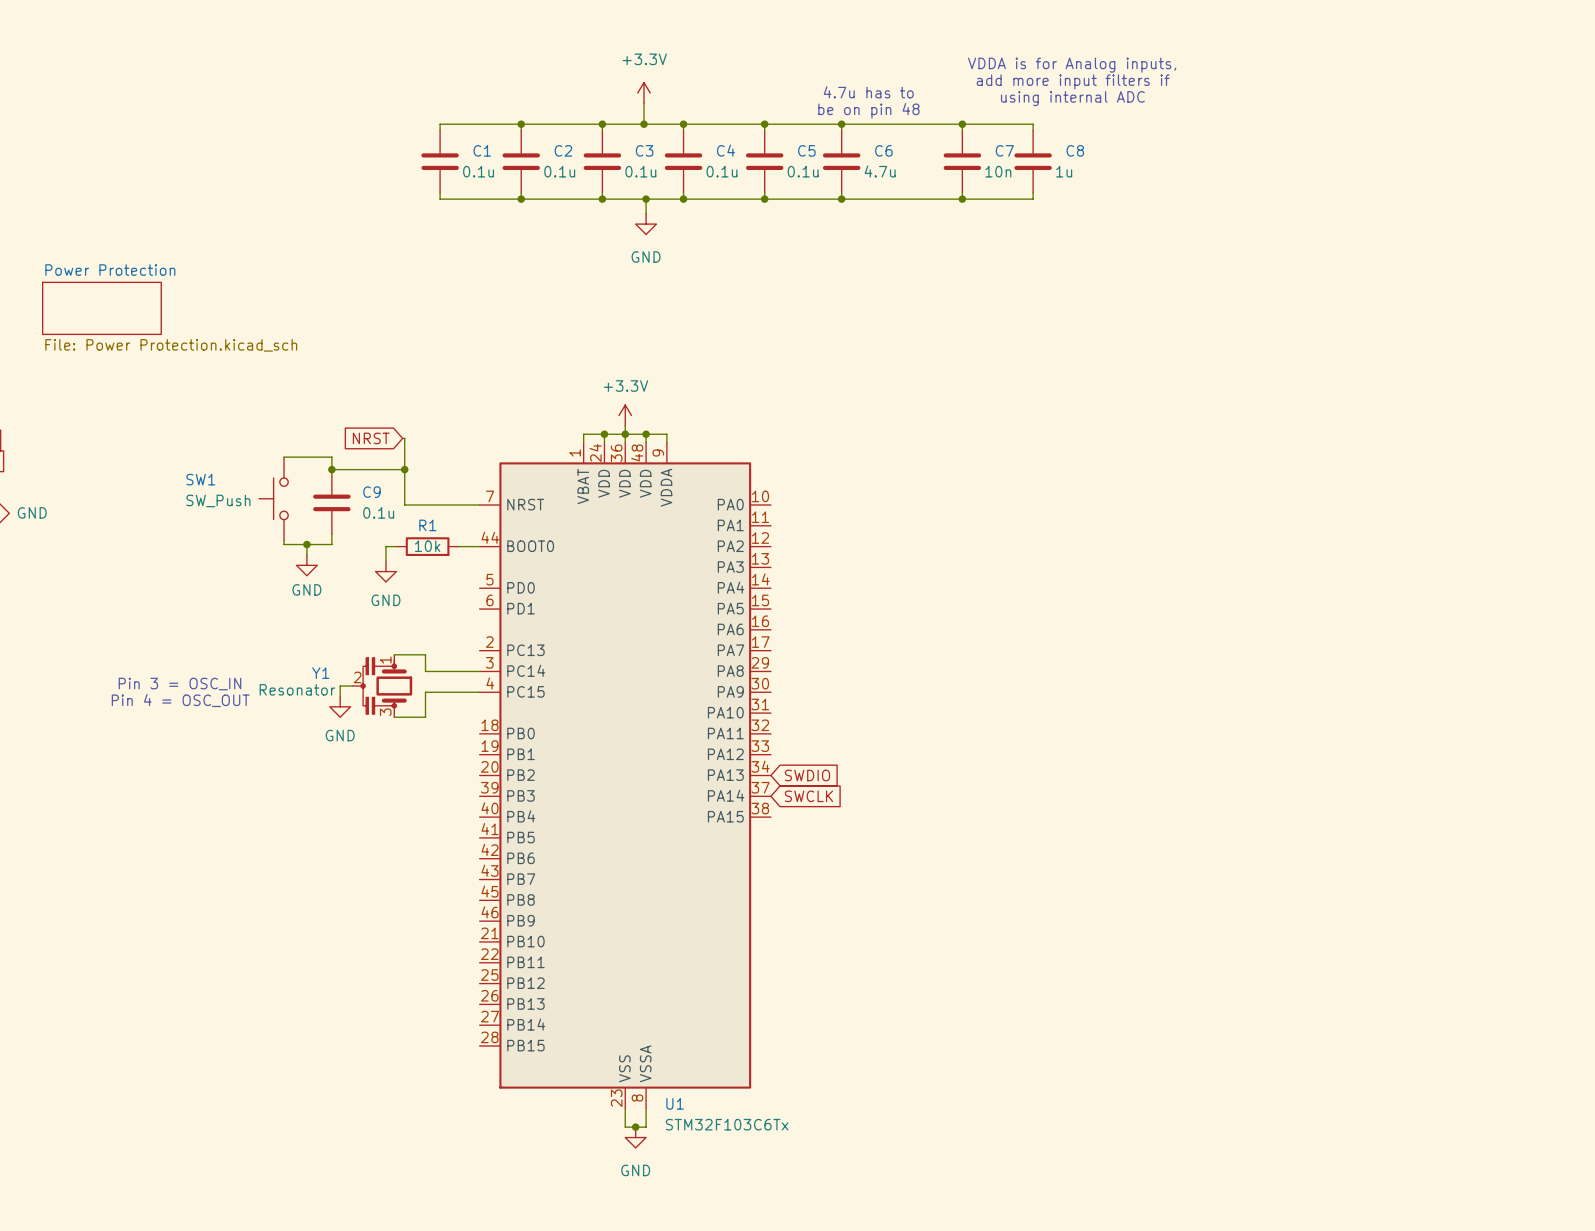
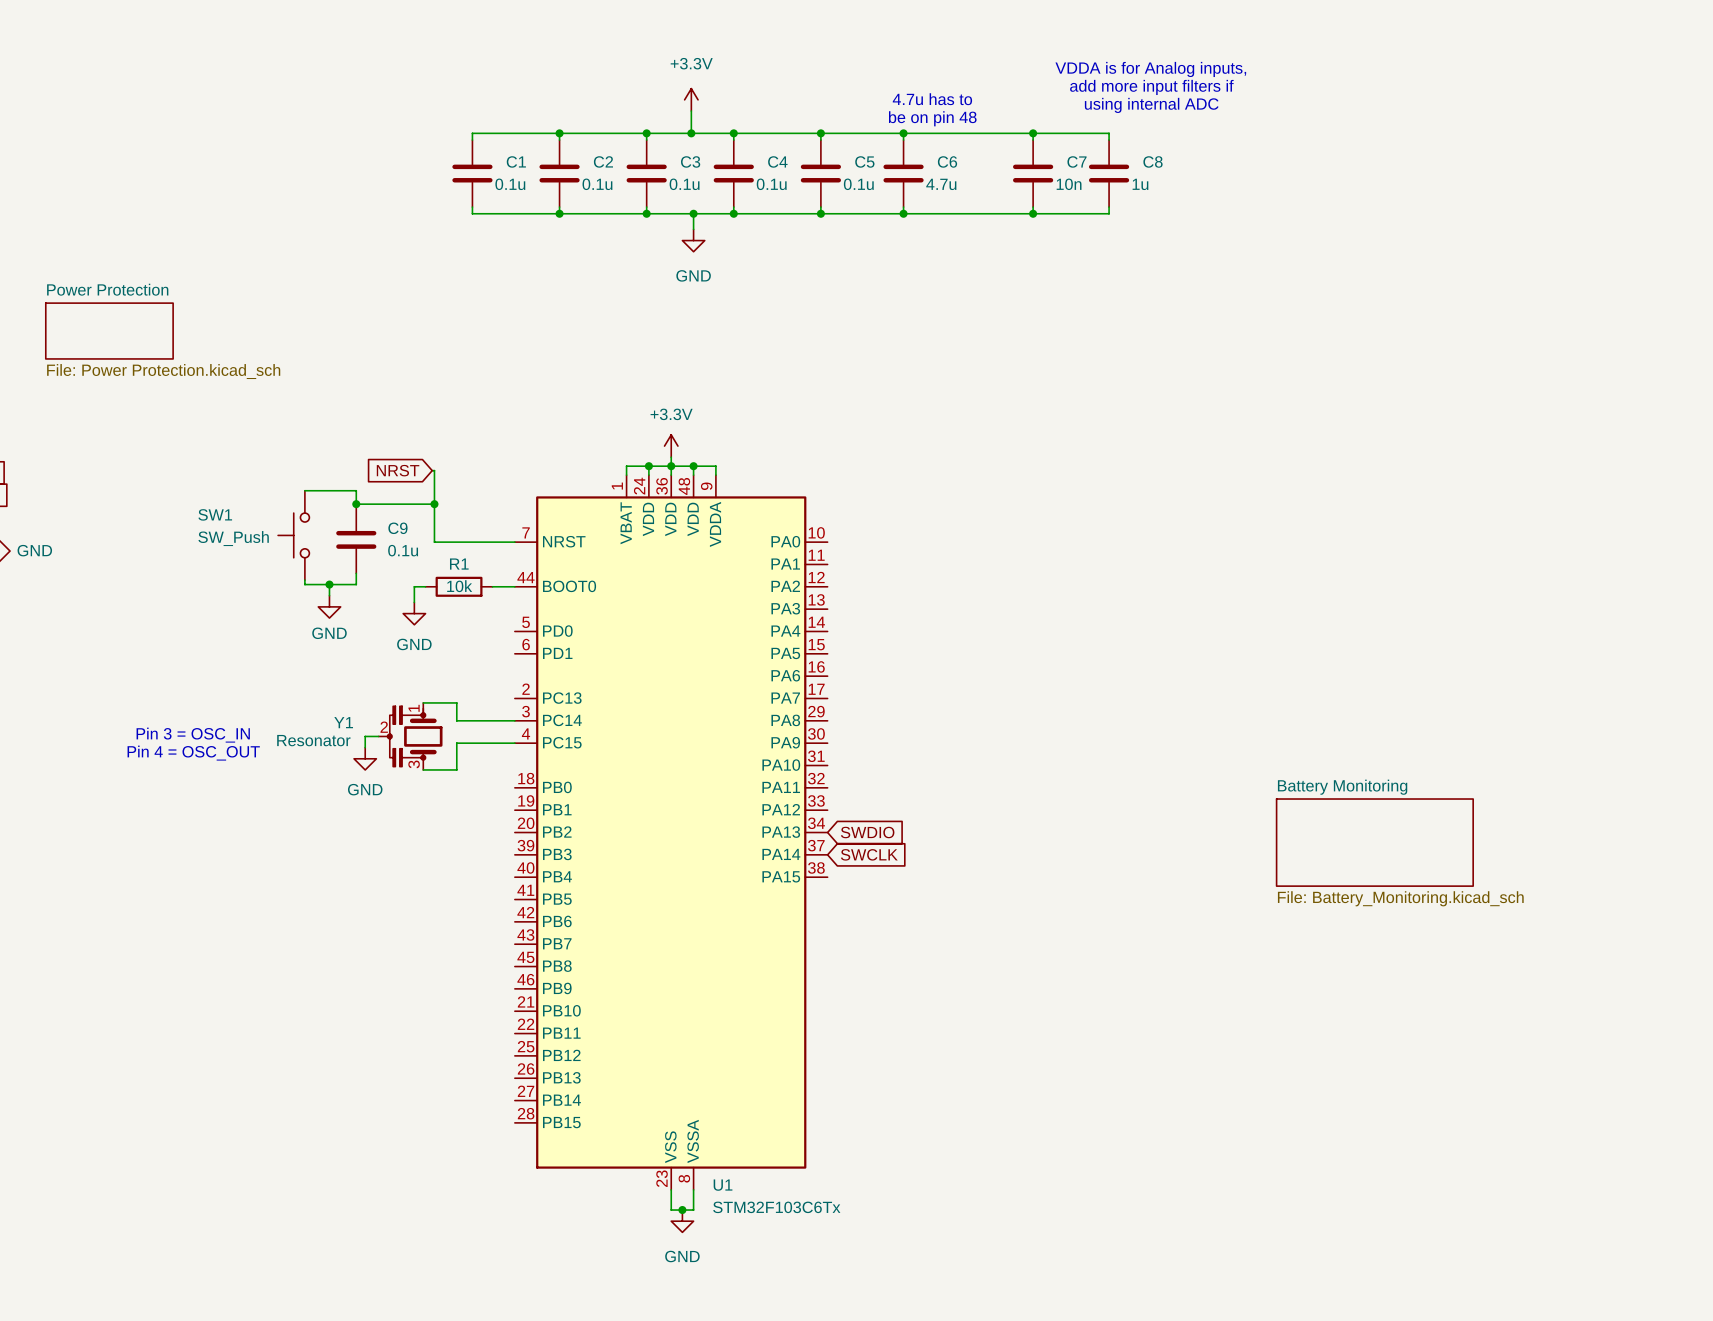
sheet Battery Monitoring: none -> File: Battery_Monitoring.kicad_sch (1374, 842)

